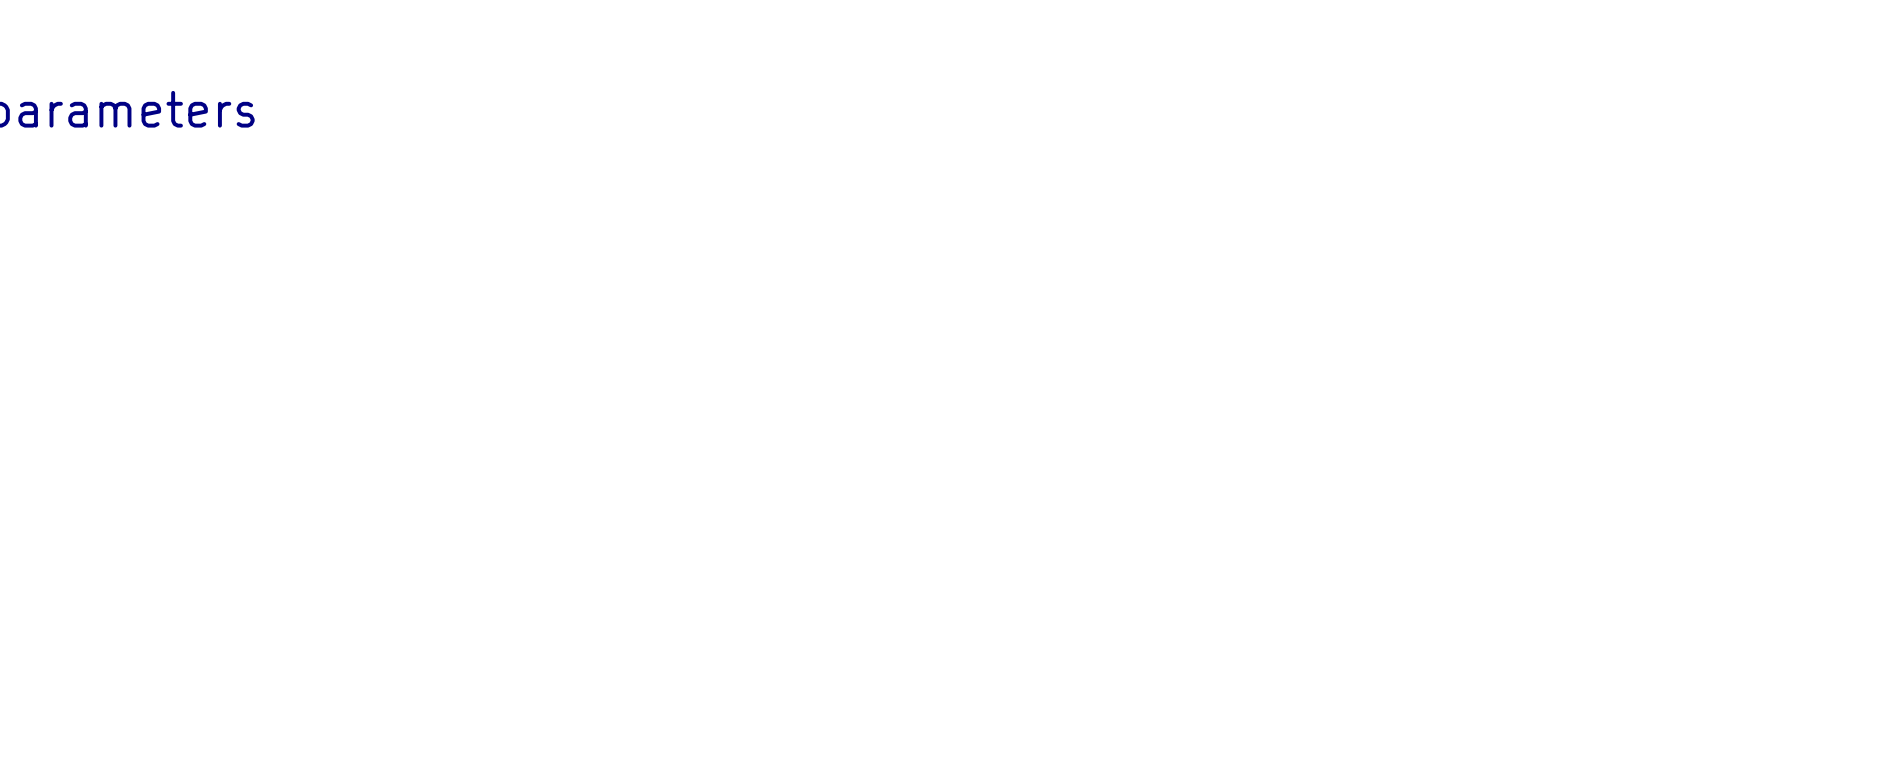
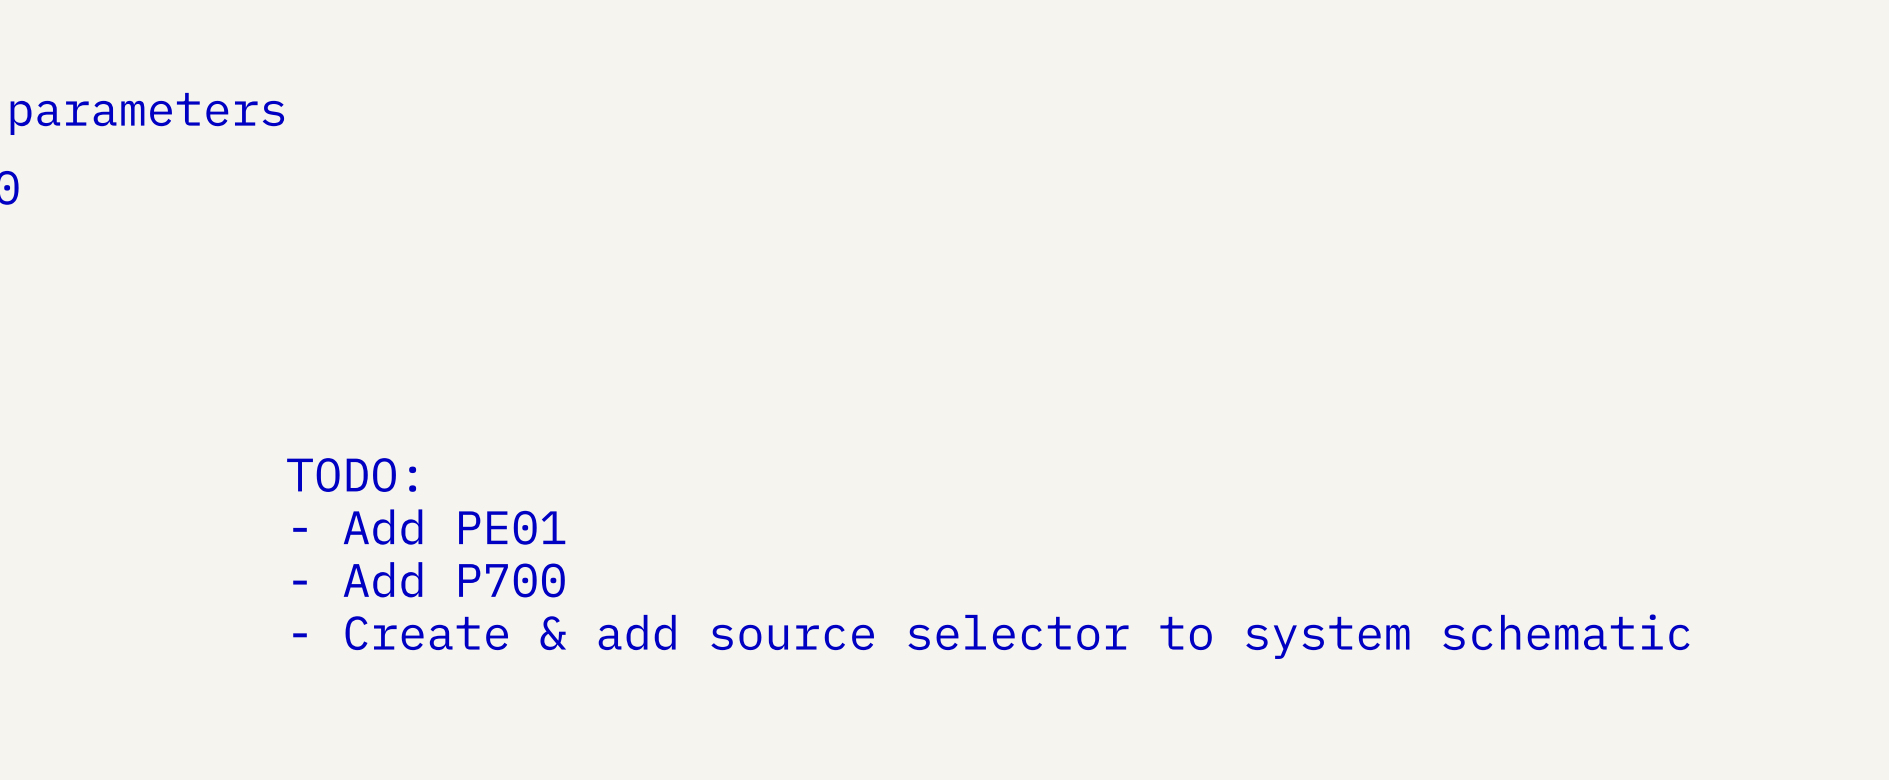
text: none -> TODO: (351, 475)
text: none -> - Add PE01 (429, 527)
text: none -> - Add P700 (429, 579)
text: none -> - Create & add source selector to system schematic (991, 636)

